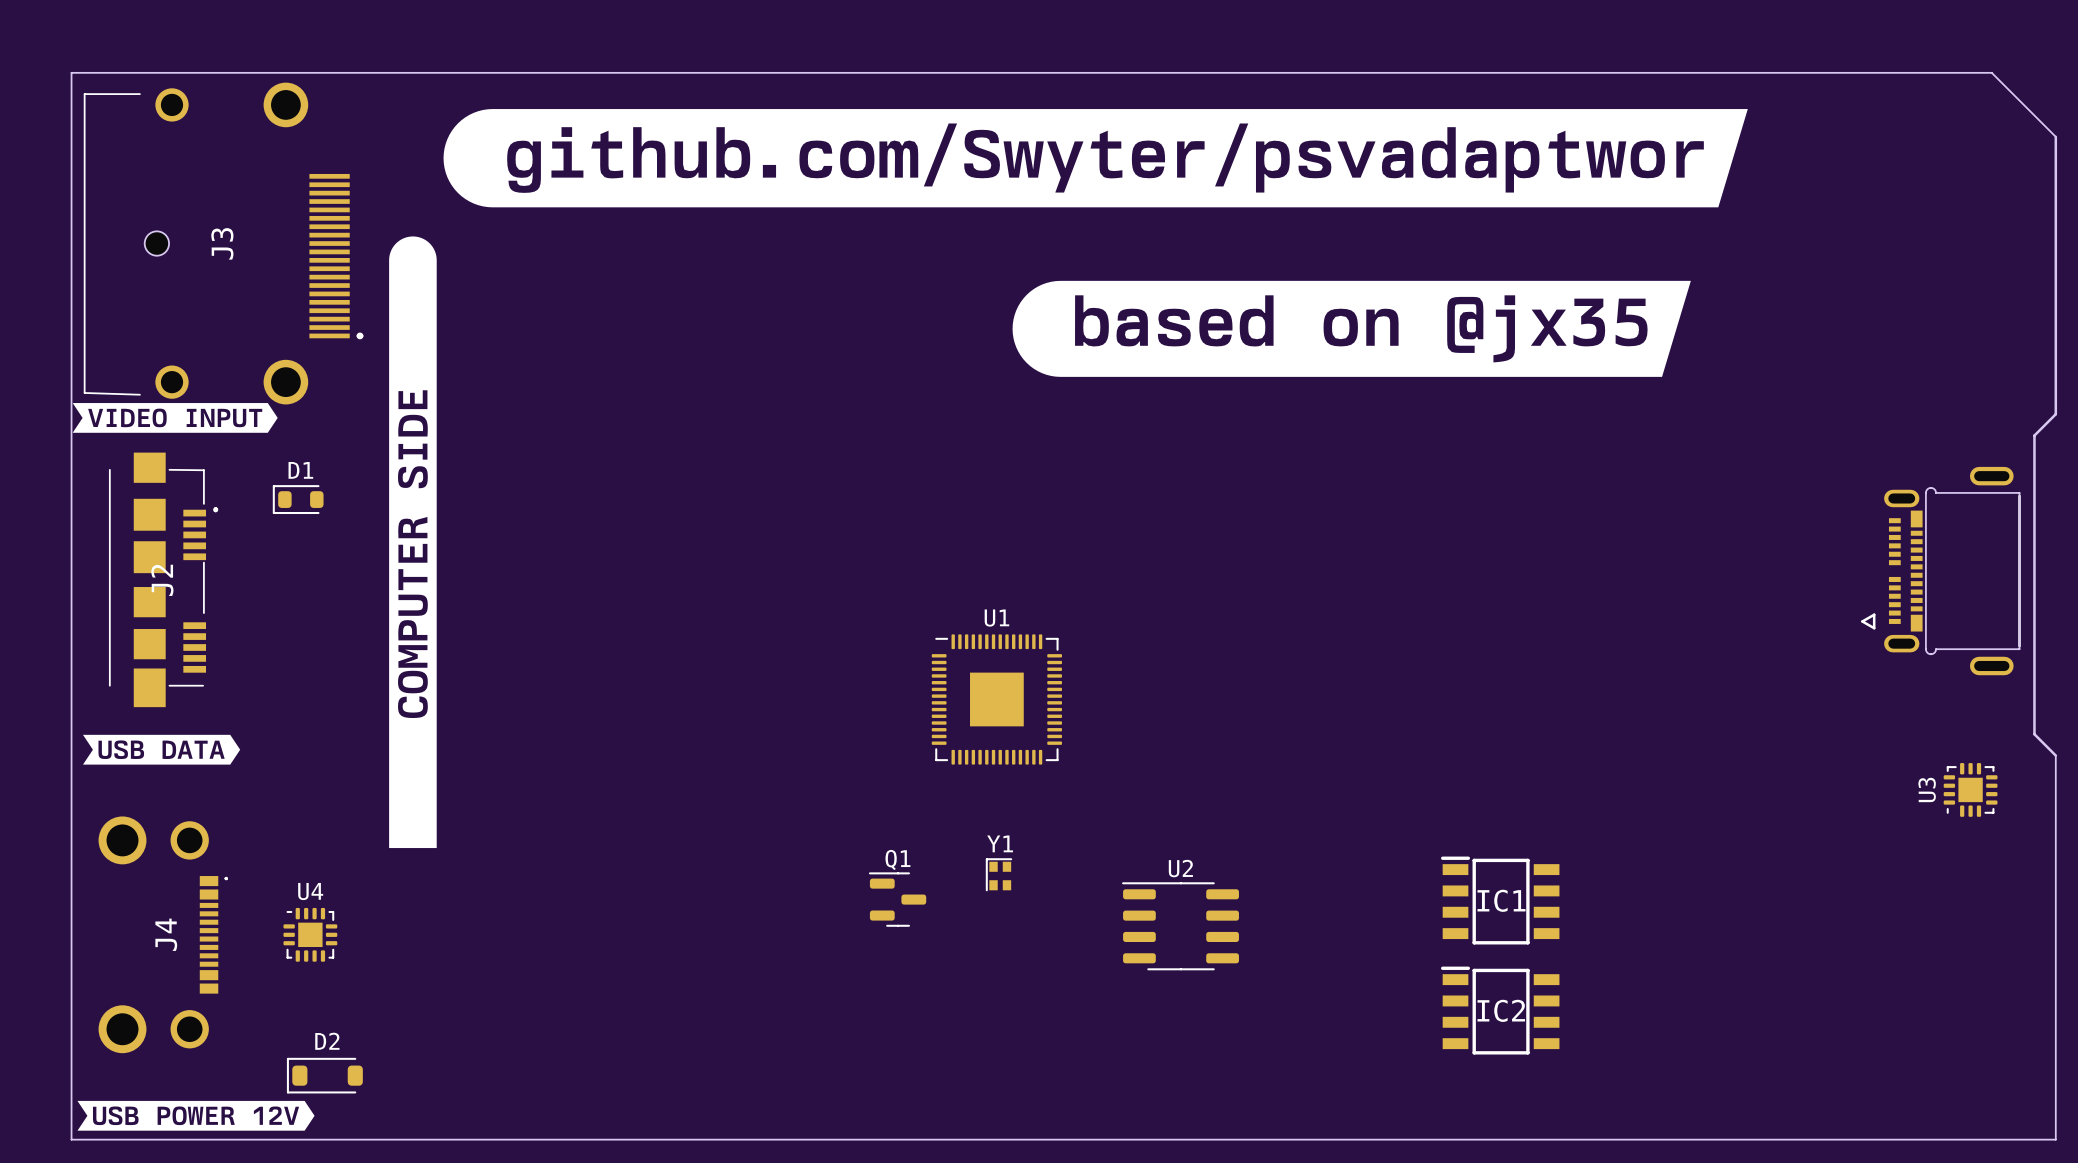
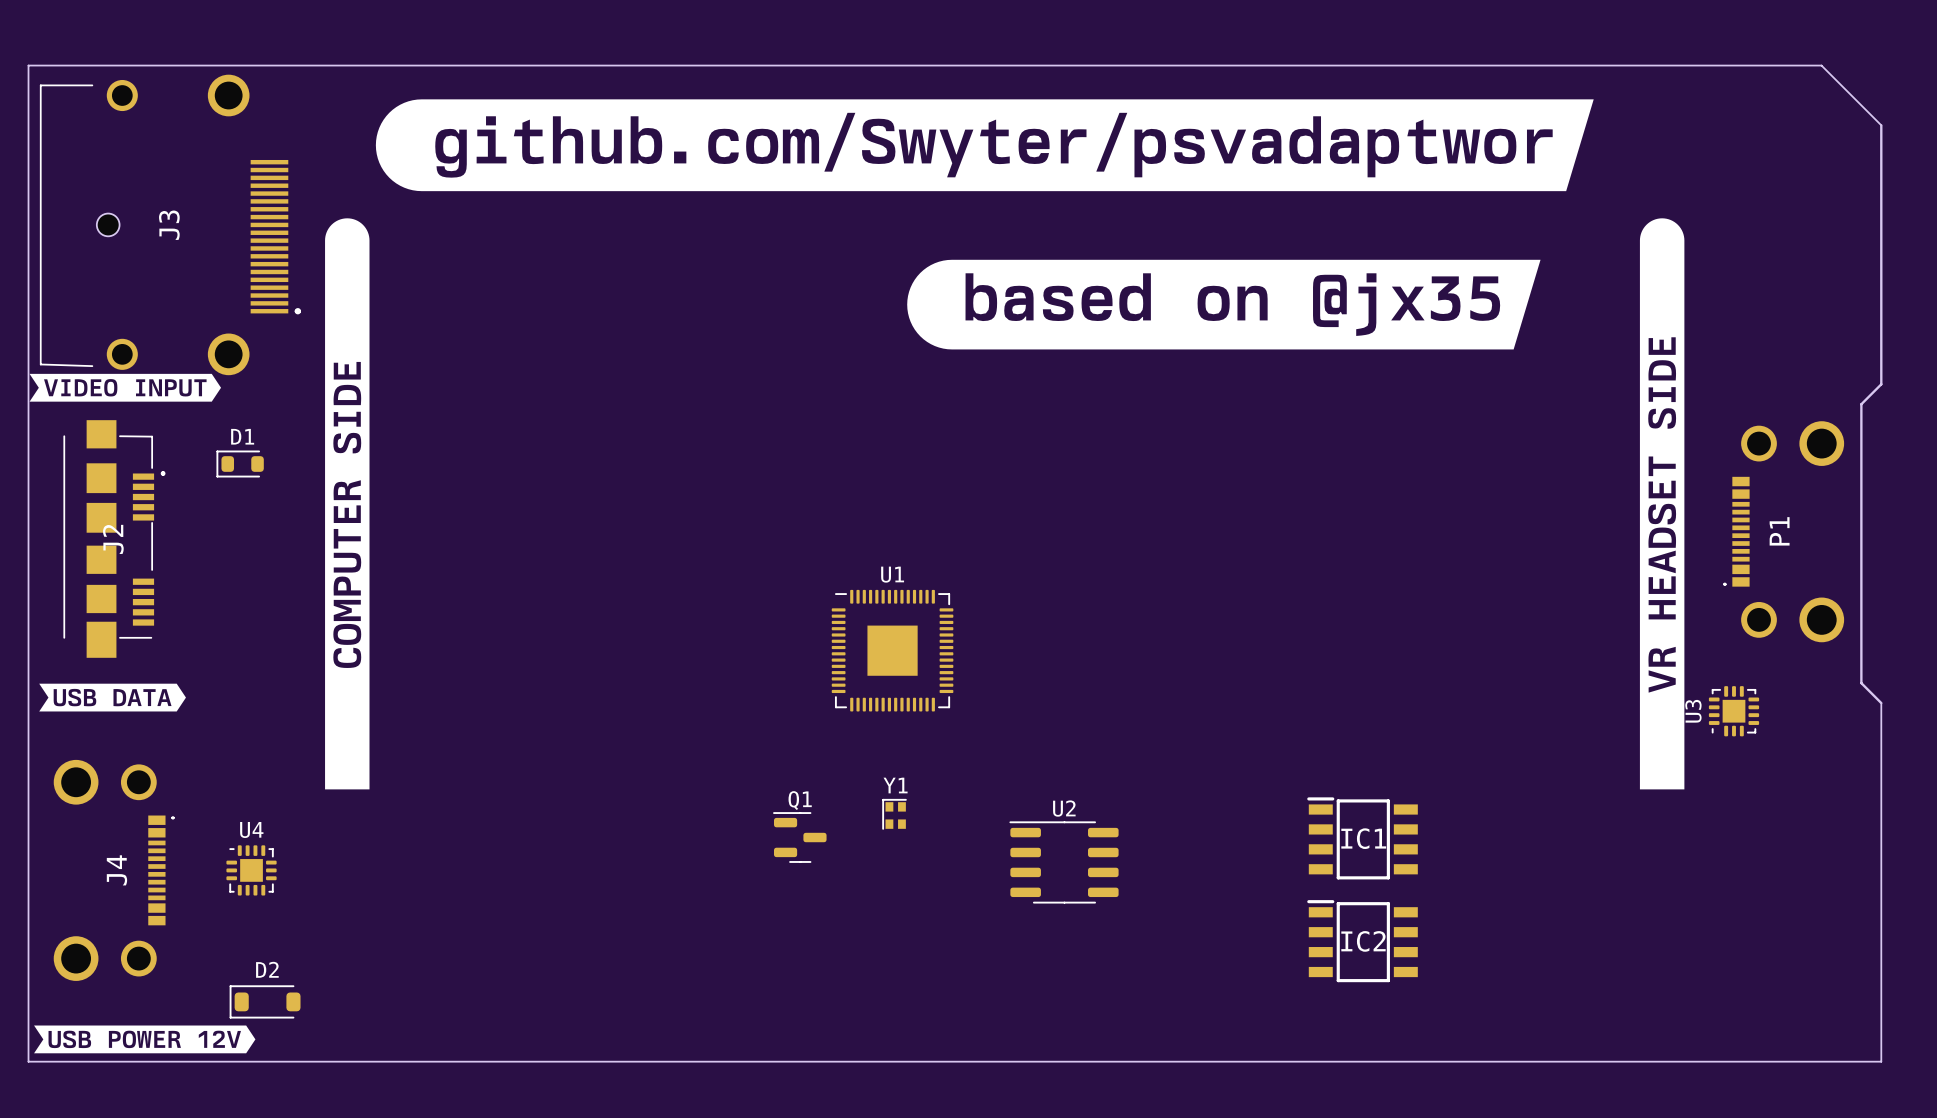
drawing: none -> [1639, 218, 1685, 790]
part: (1940, 571) -> none
P1: none -> (1783, 531)
U3 position: (1970, 789) -> (1733, 711)

